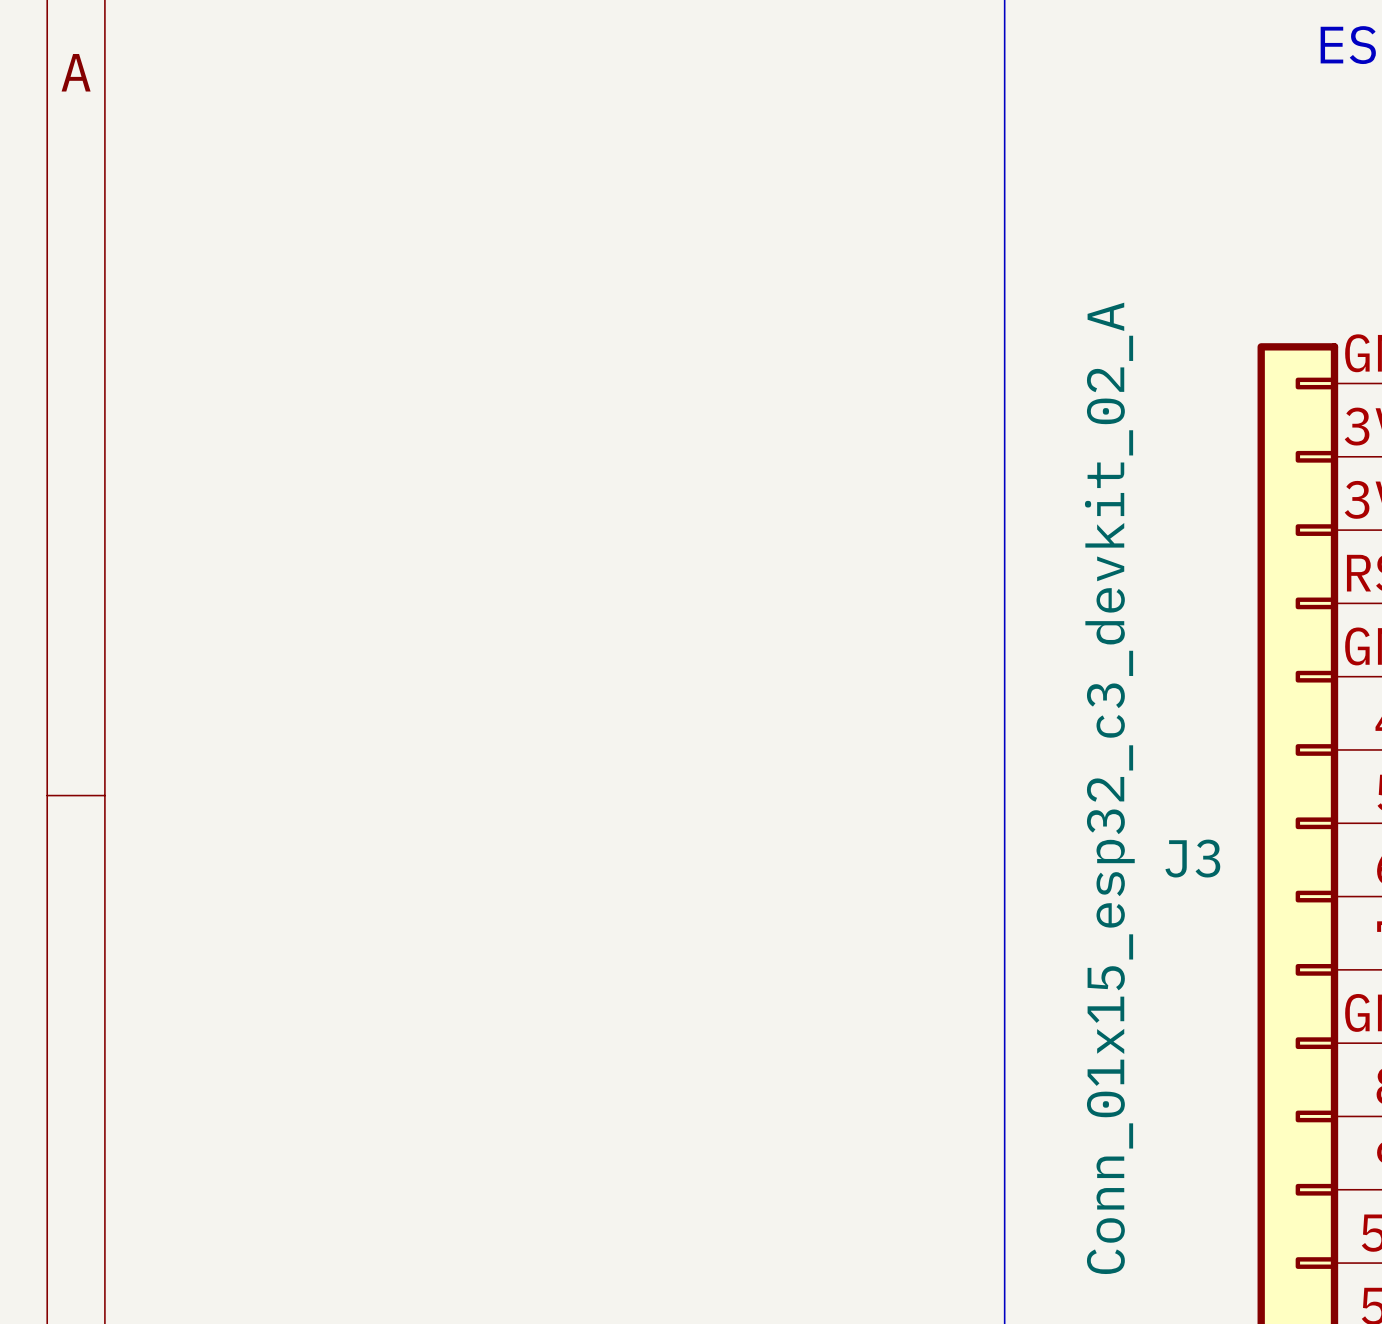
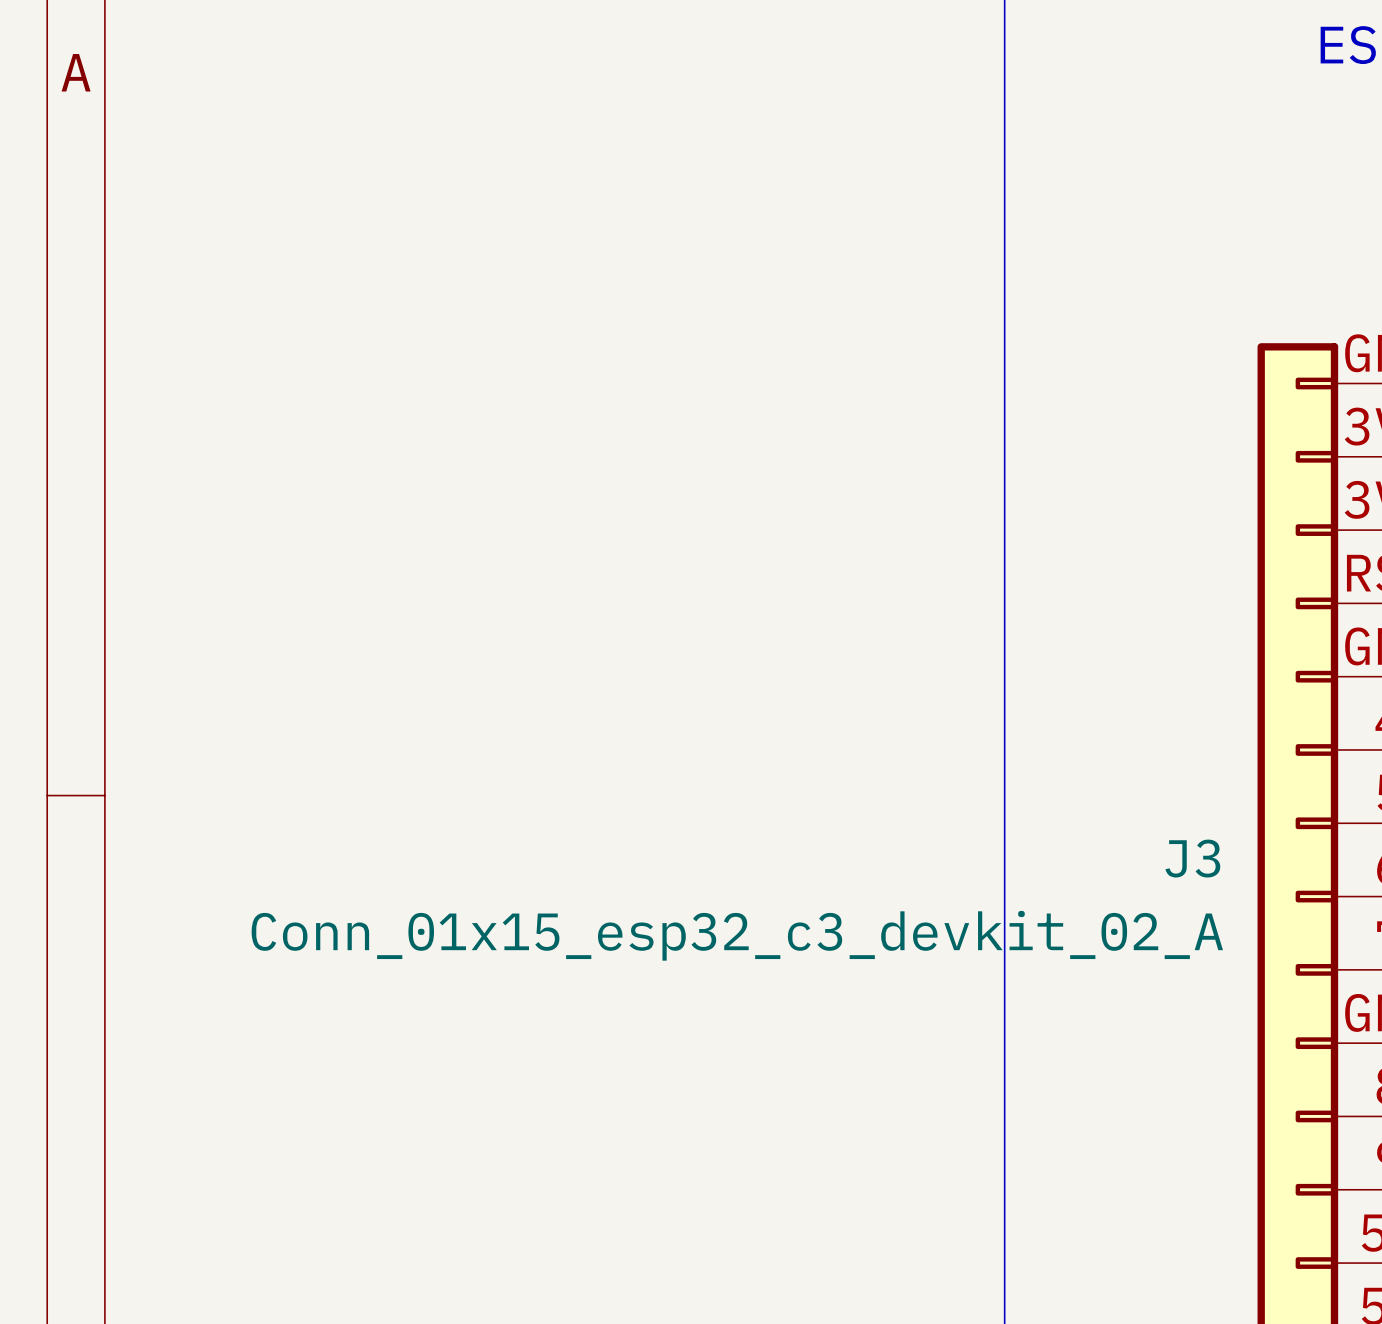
J3 value rotation: 0° (1109, 788) -> 90° clockwise (737, 935)

